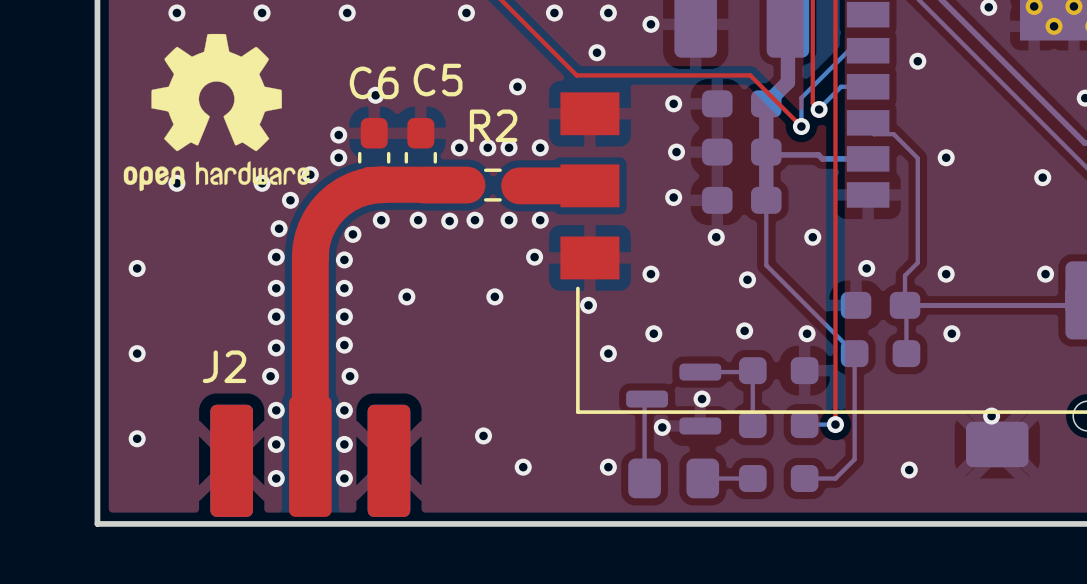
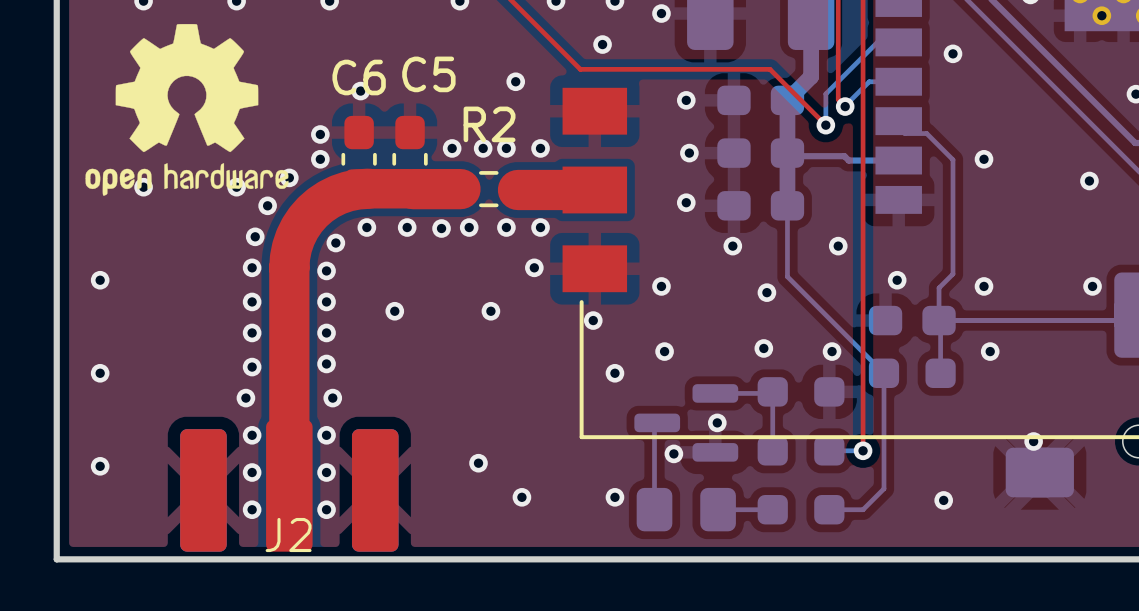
J2 name position: J2 (224, 366) -> J2 (288, 535)

